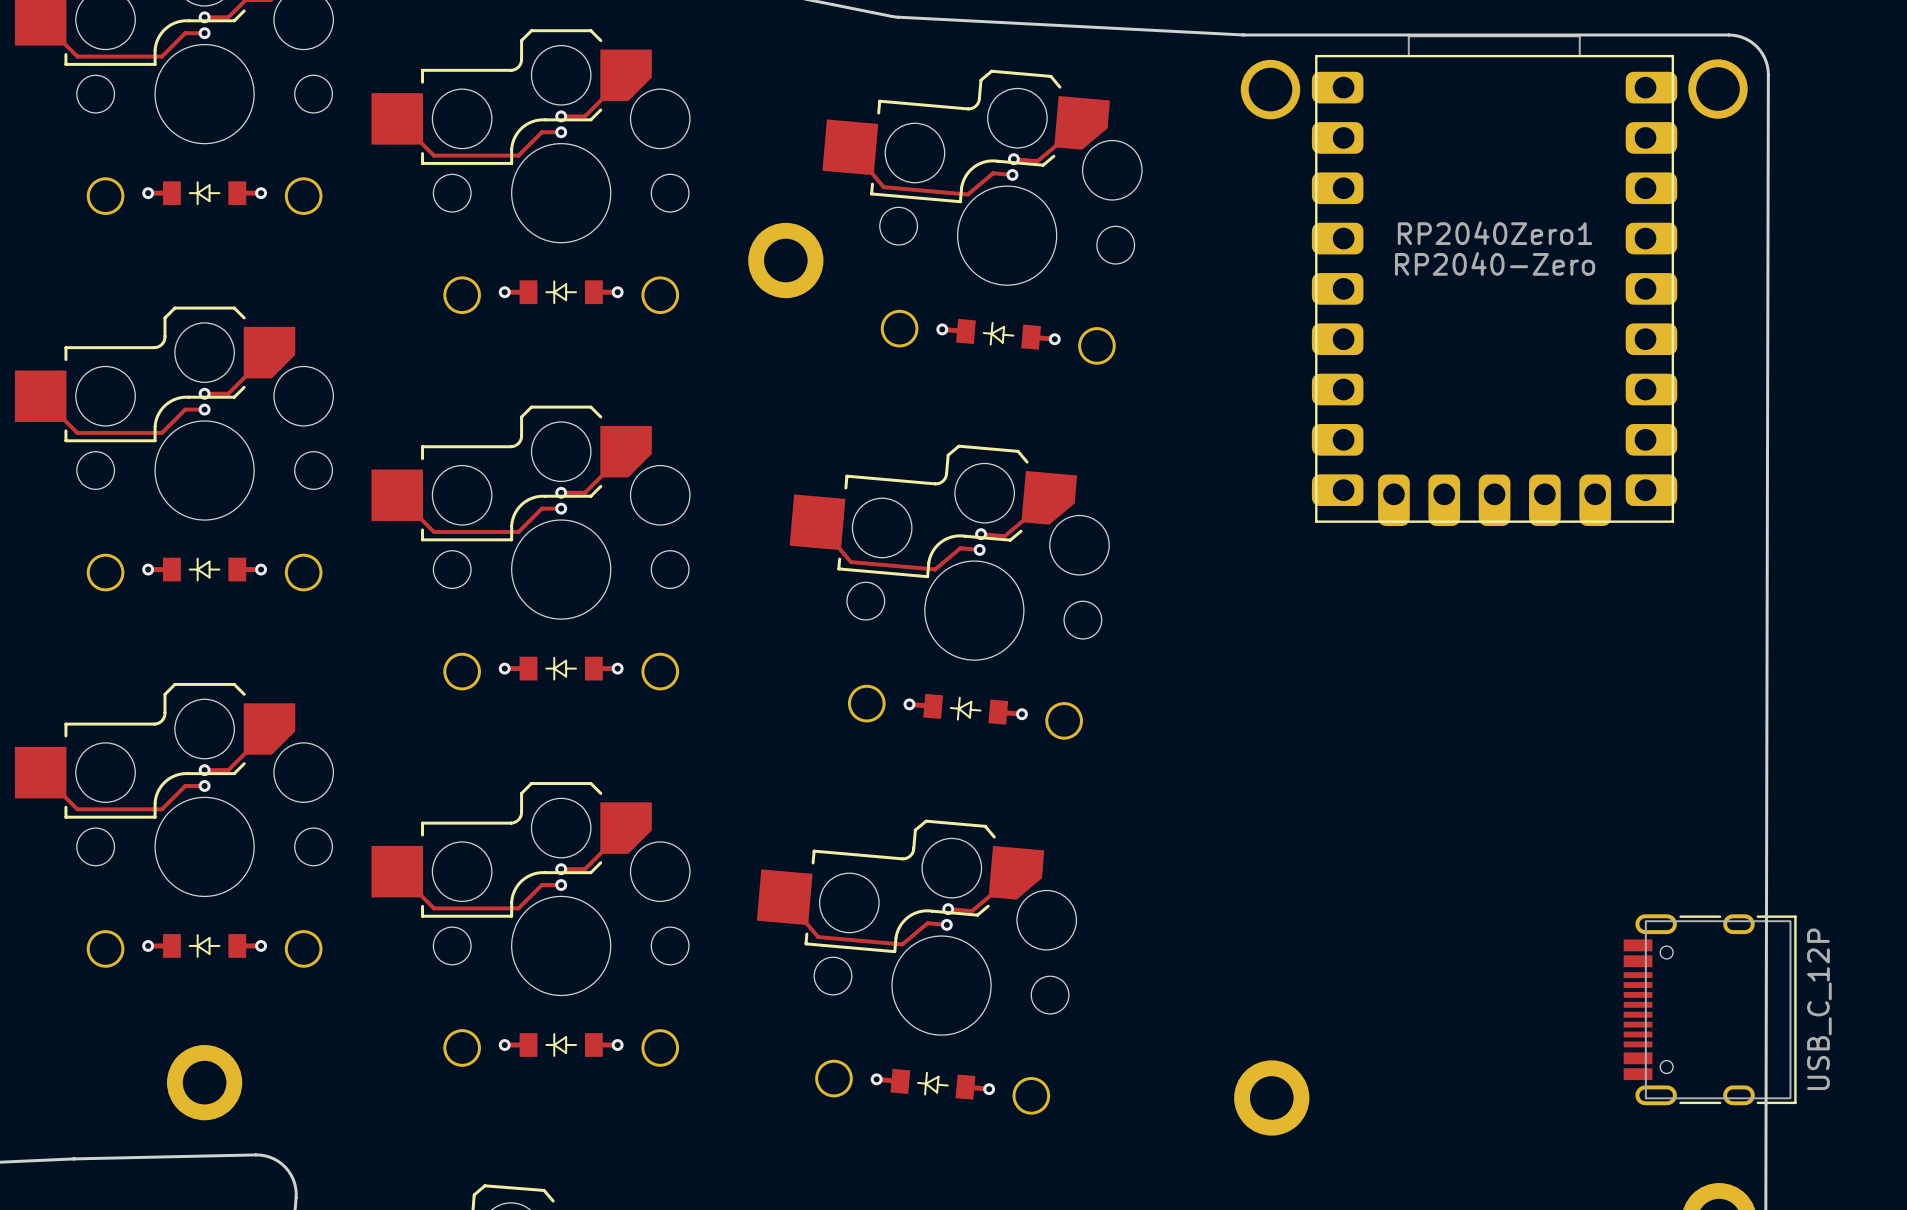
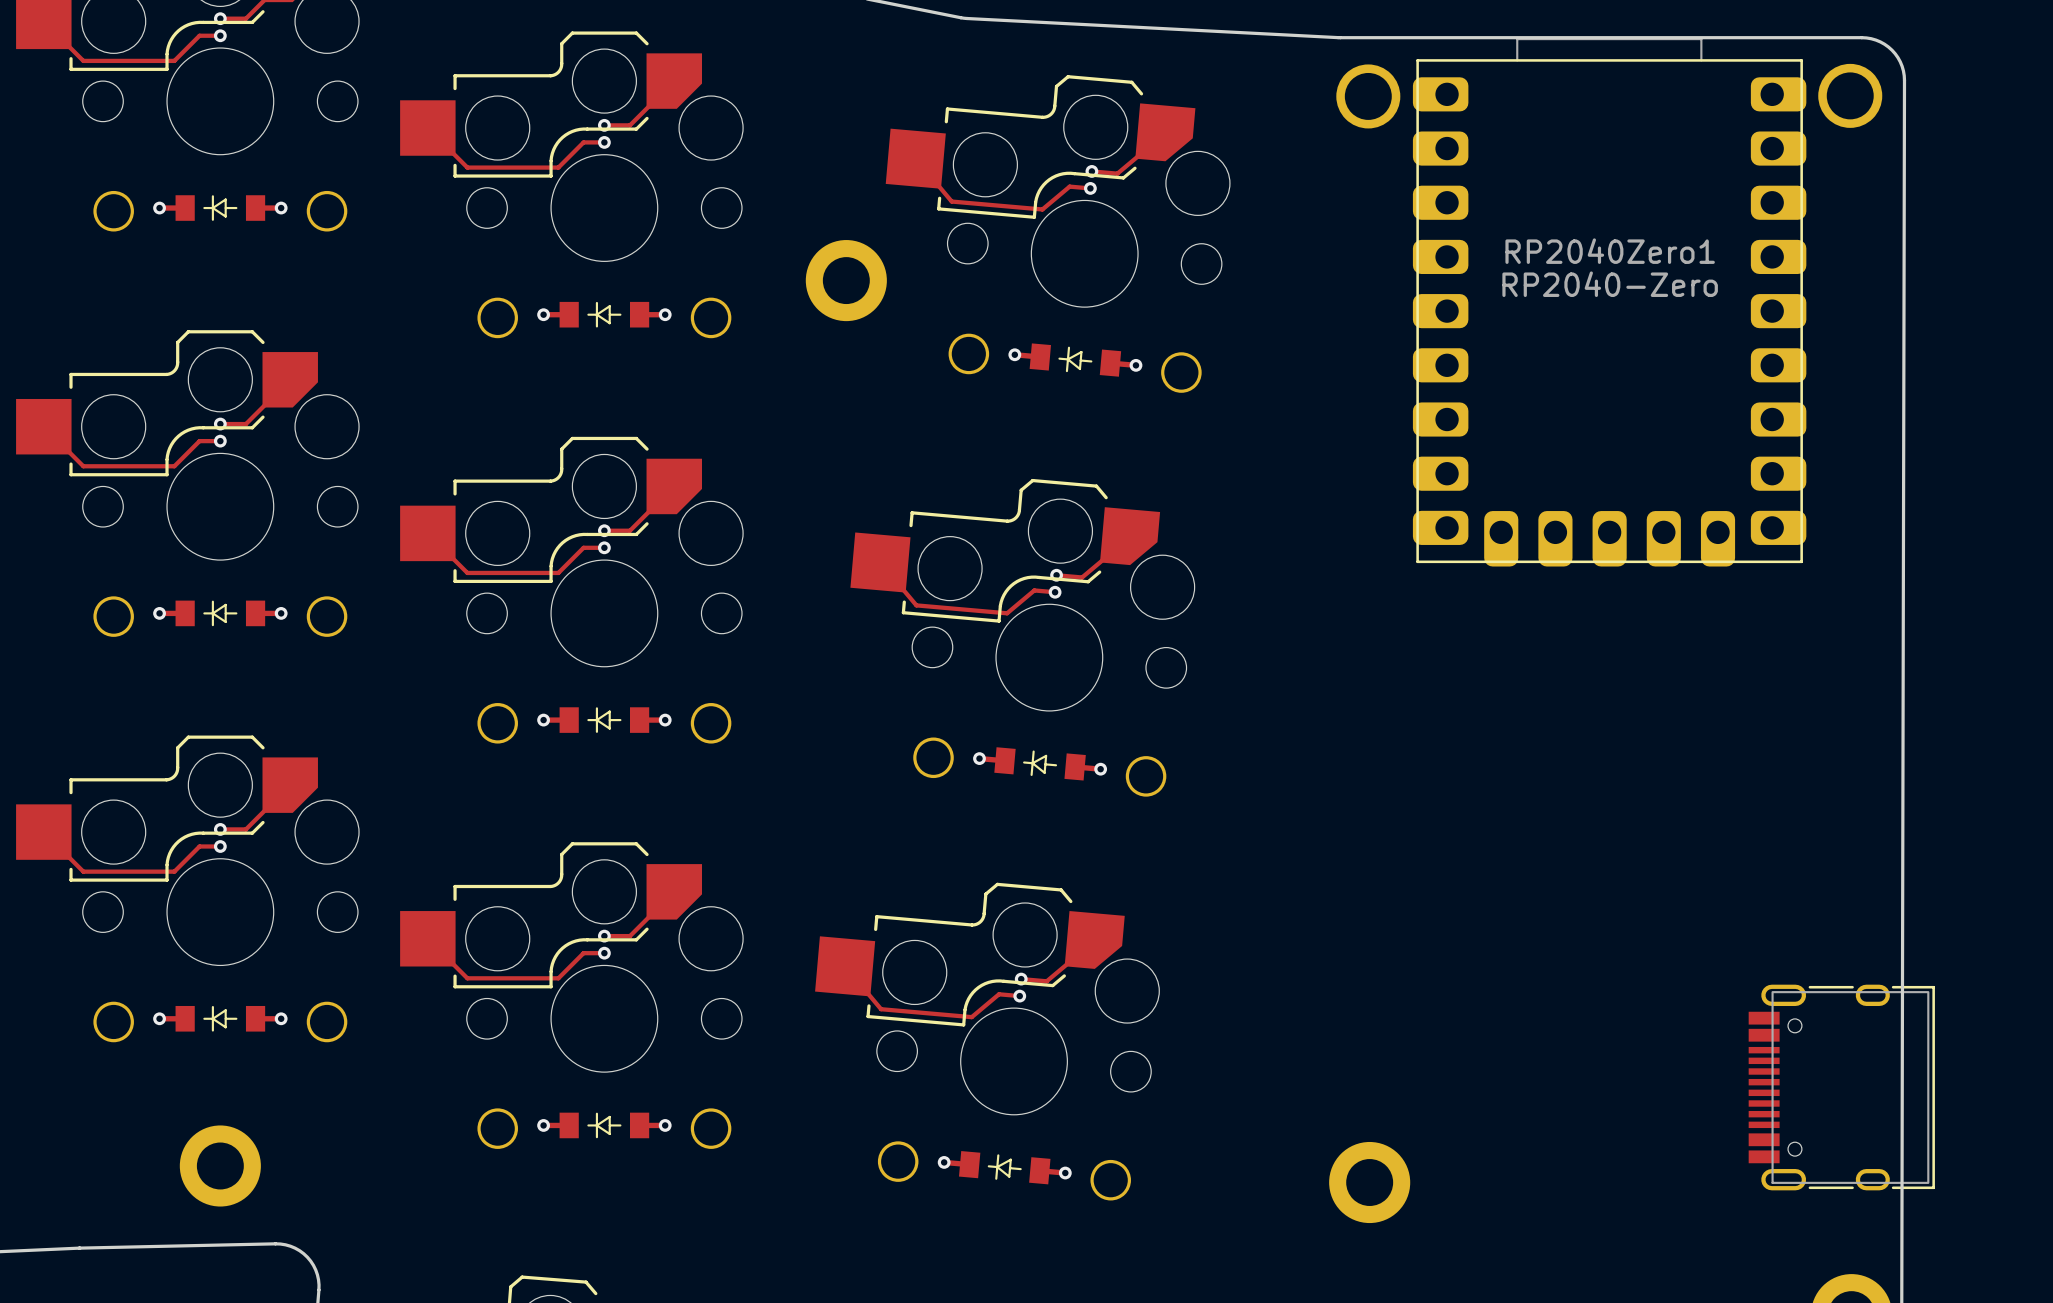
part value: USB_C_12P (1819, 1009) -> none

